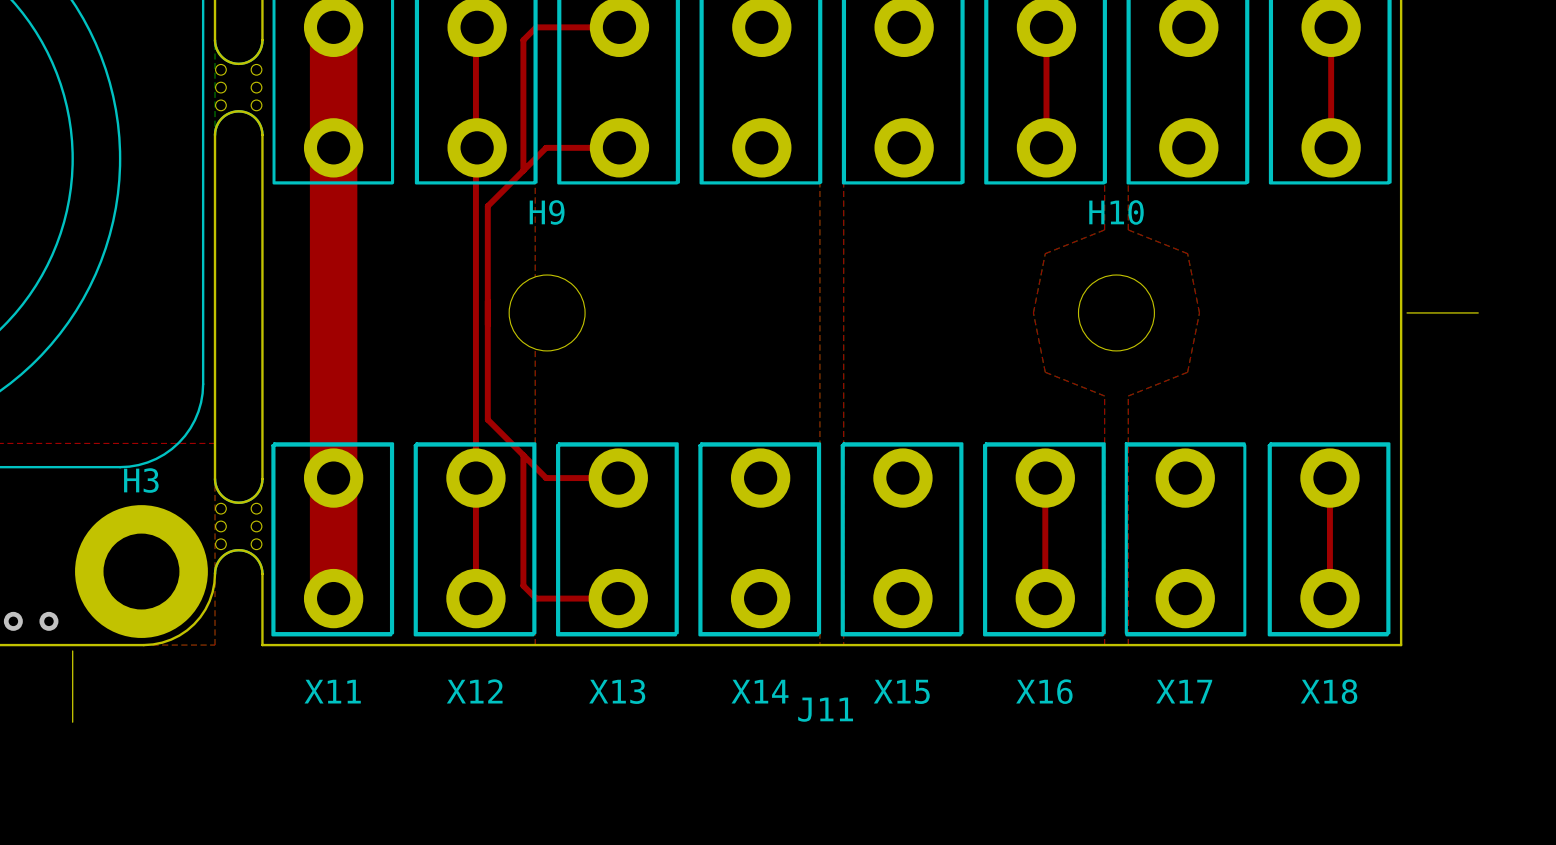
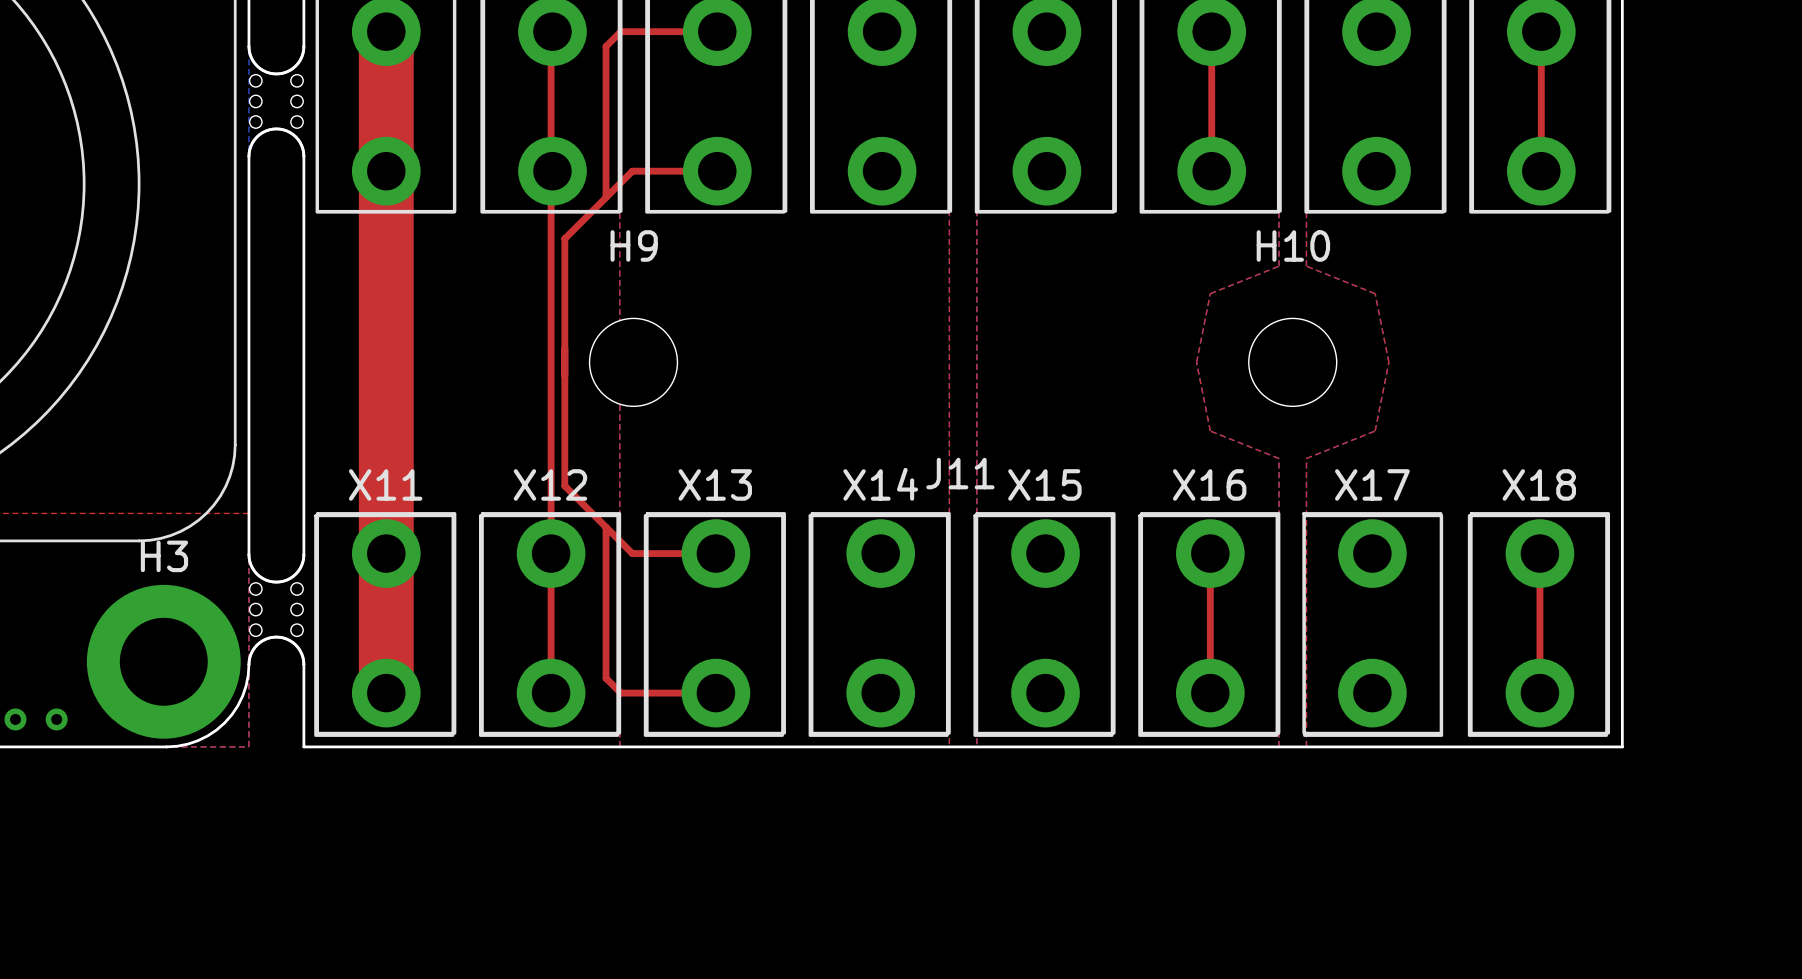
board edge: (1407, 312) (1478, 312) -> none
board edge: (72, 651) (72, 722) -> none
X11 name position: X11 (332, 691) -> X11 (385, 484)
X12 name position: X12 (474, 691) -> X12 (550, 484)
X13 name position: X13 (617, 691) -> X13 (715, 484)
X14 name position: X14 (759, 691) -> X14 (880, 484)
X15 name position: X15 (901, 691) -> X15 (1044, 484)
X16 name position: X16 (1044, 691) -> X16 (1209, 484)
X17 name position: X17 (1184, 691) -> X17 (1372, 484)
X18 name position: X18 (1329, 691) -> X18 (1539, 484)
J11 name position: J11 (825, 709) -> J11 (960, 473)

